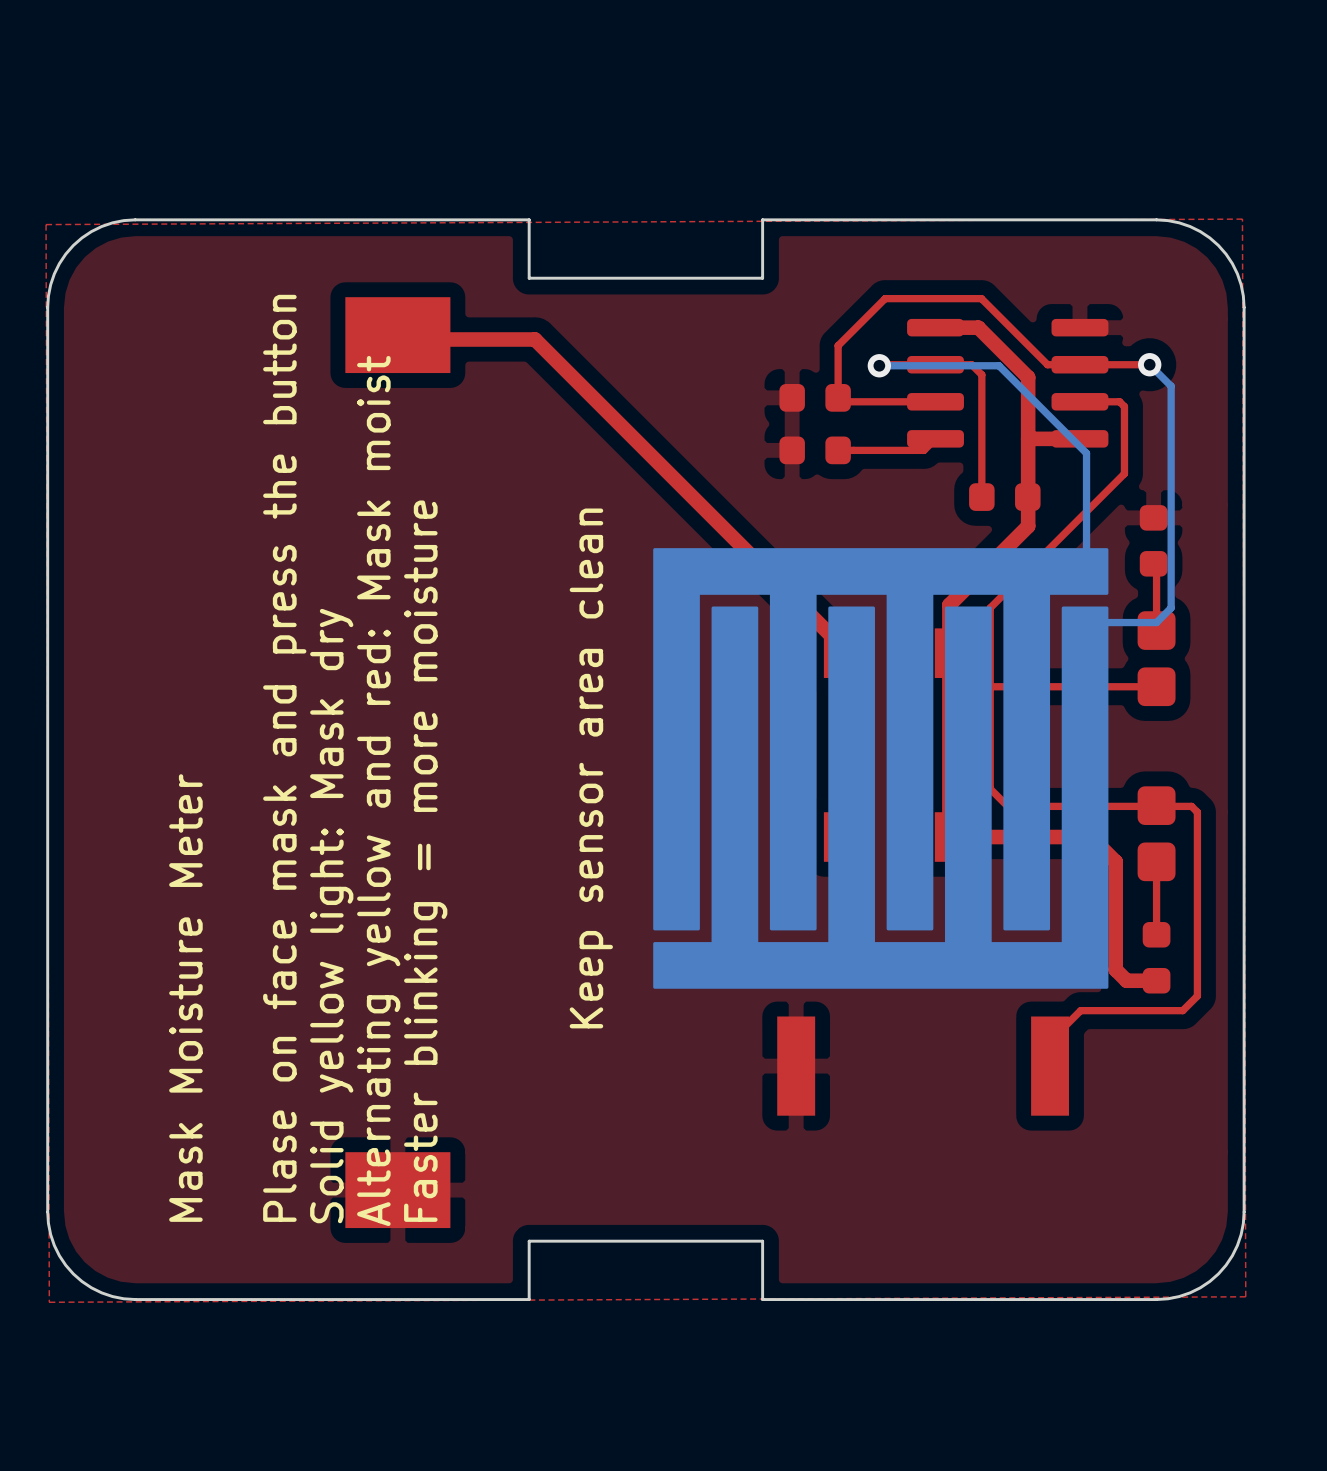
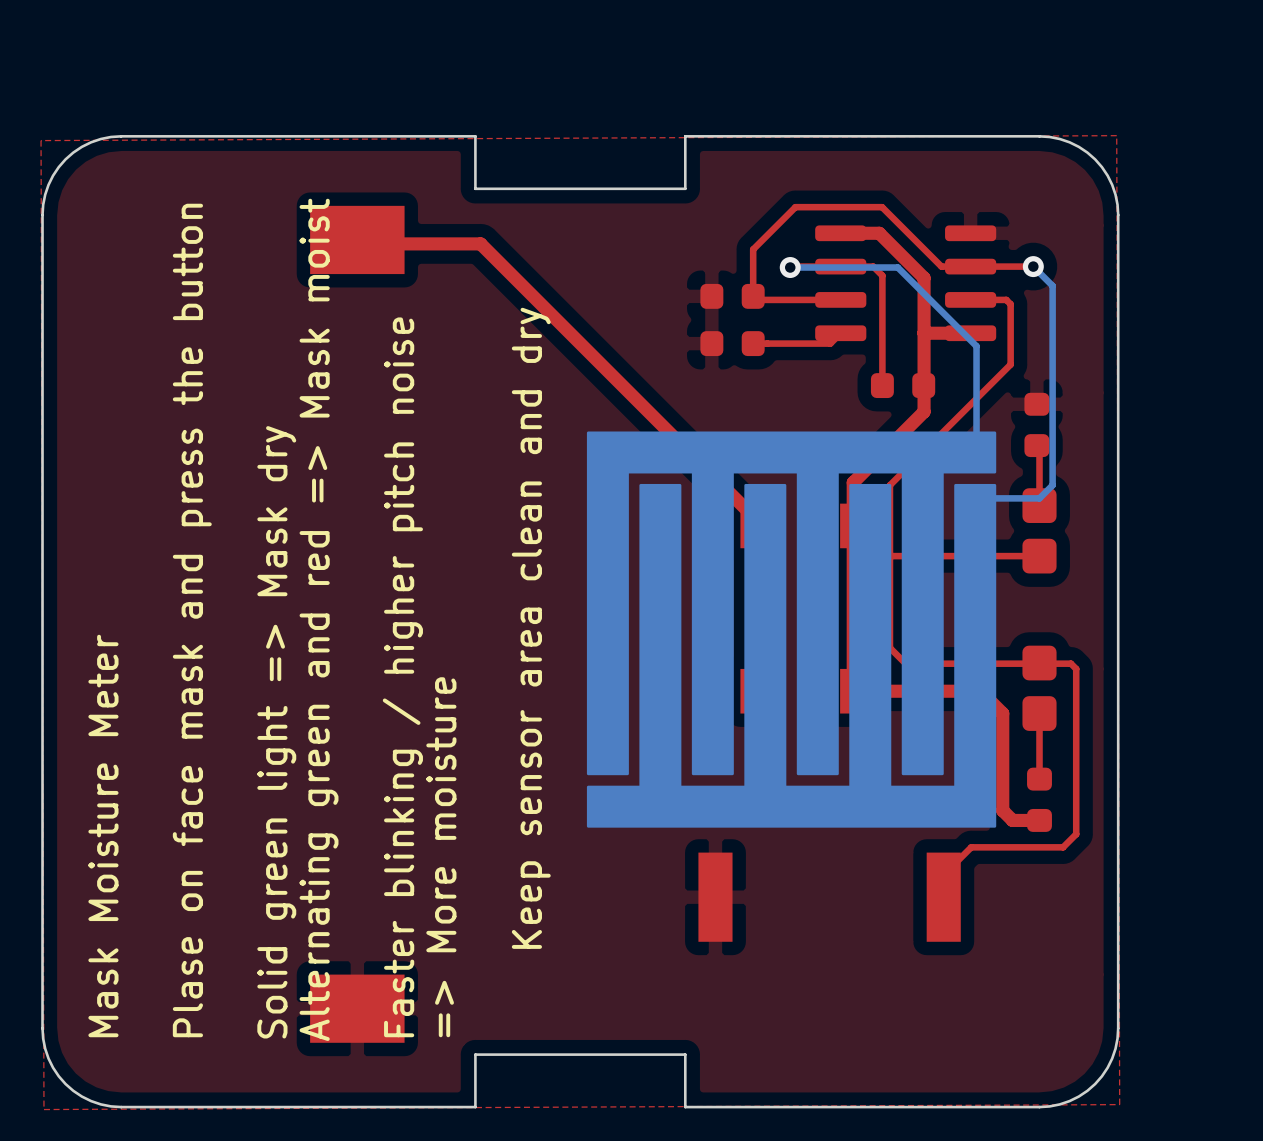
text: Plase on face mask and press the button (284, 758) -> none
text: Keep sensor area clean (591, 768) -> Keep sensor area clean and dry (531, 628)
text: Alternating yellow and red: Mask moist (378, 791) -> Alternating green and red => Mask moist (319, 619)
text: Faster blinking = more moisture (425, 861) -> Faster blinking / higher pitch noise (402, 677)
text: Solid yellow light: Mask dry (331, 916) -> Solid green light => Mask dry (276, 732)
text: none -> Mask Moisture Meter (103, 836)
text: Mask Moisture Meter (185, 998) -> Plase on face mask and press the button (192, 620)
text: none -> => More moisture (441, 857)

